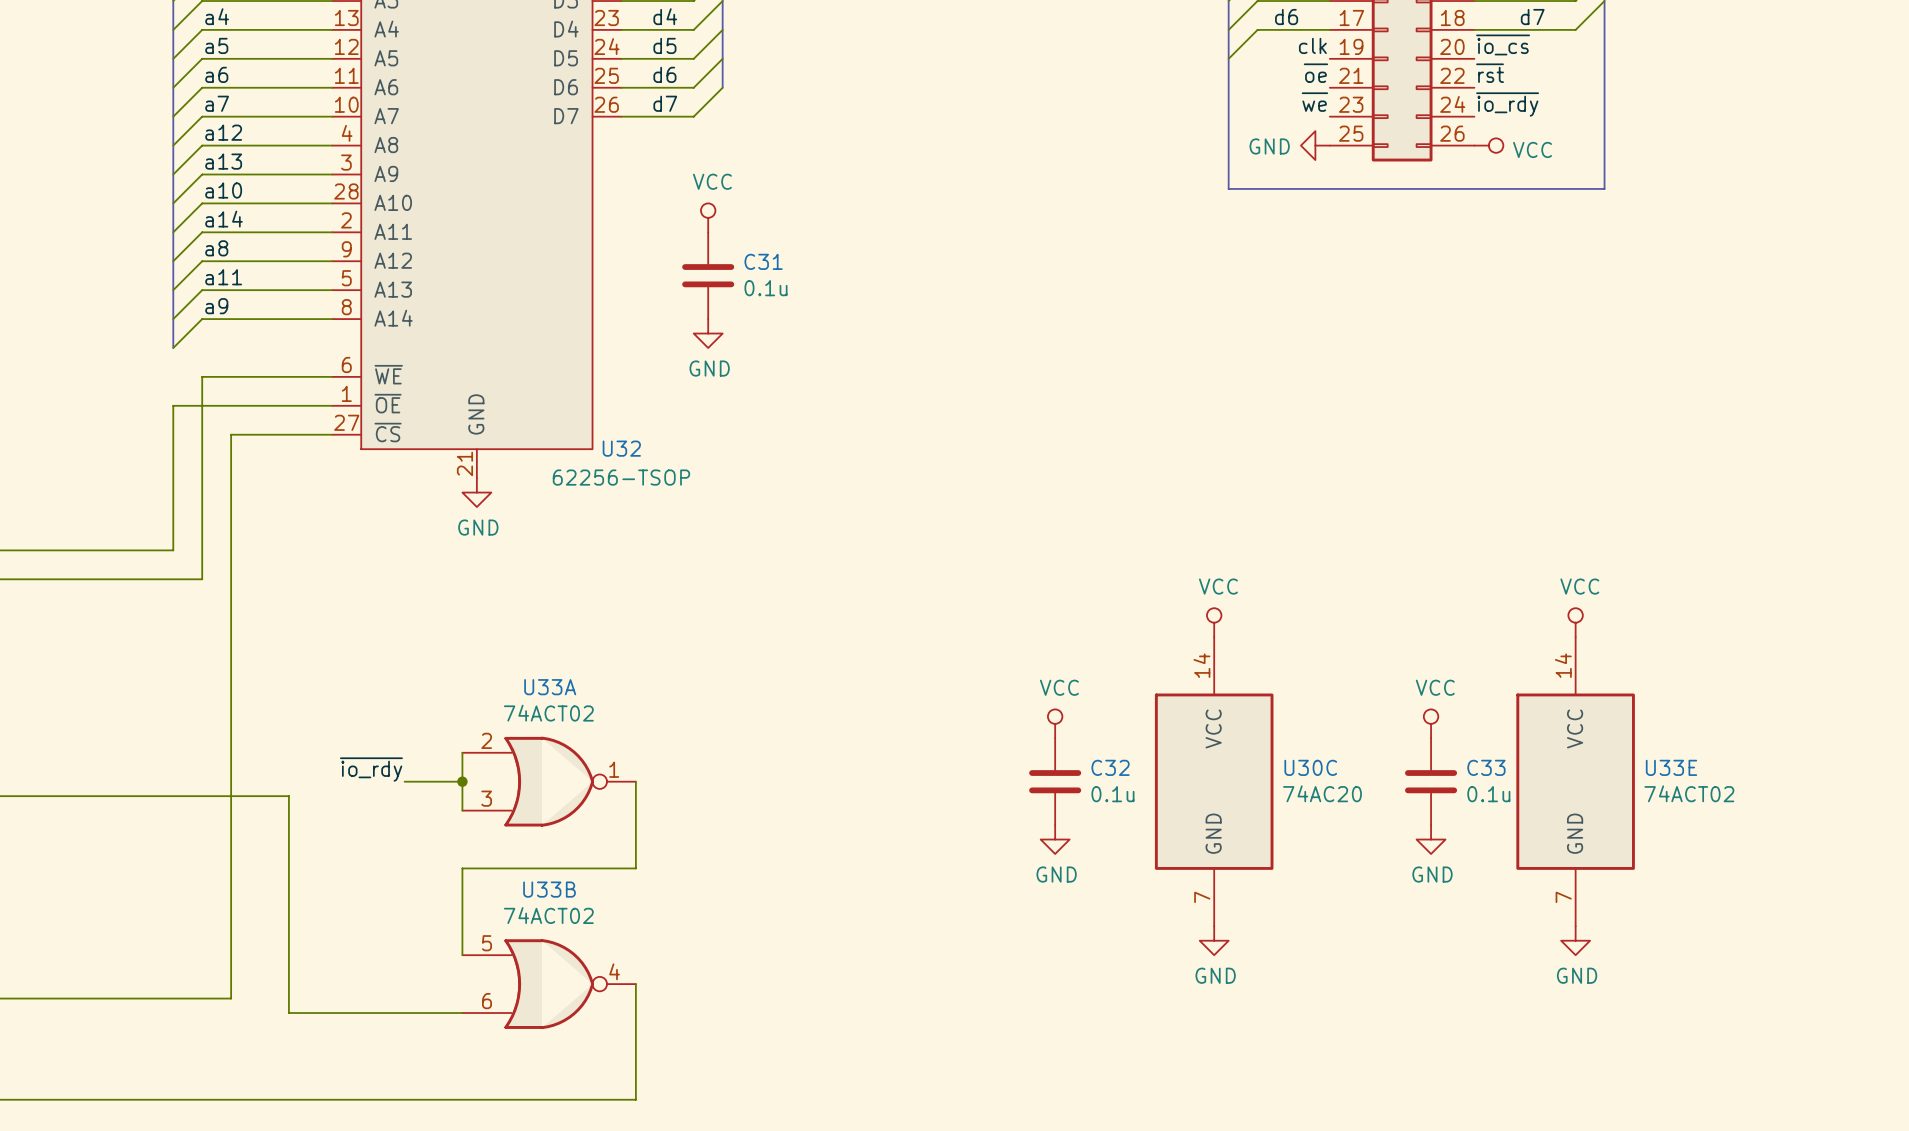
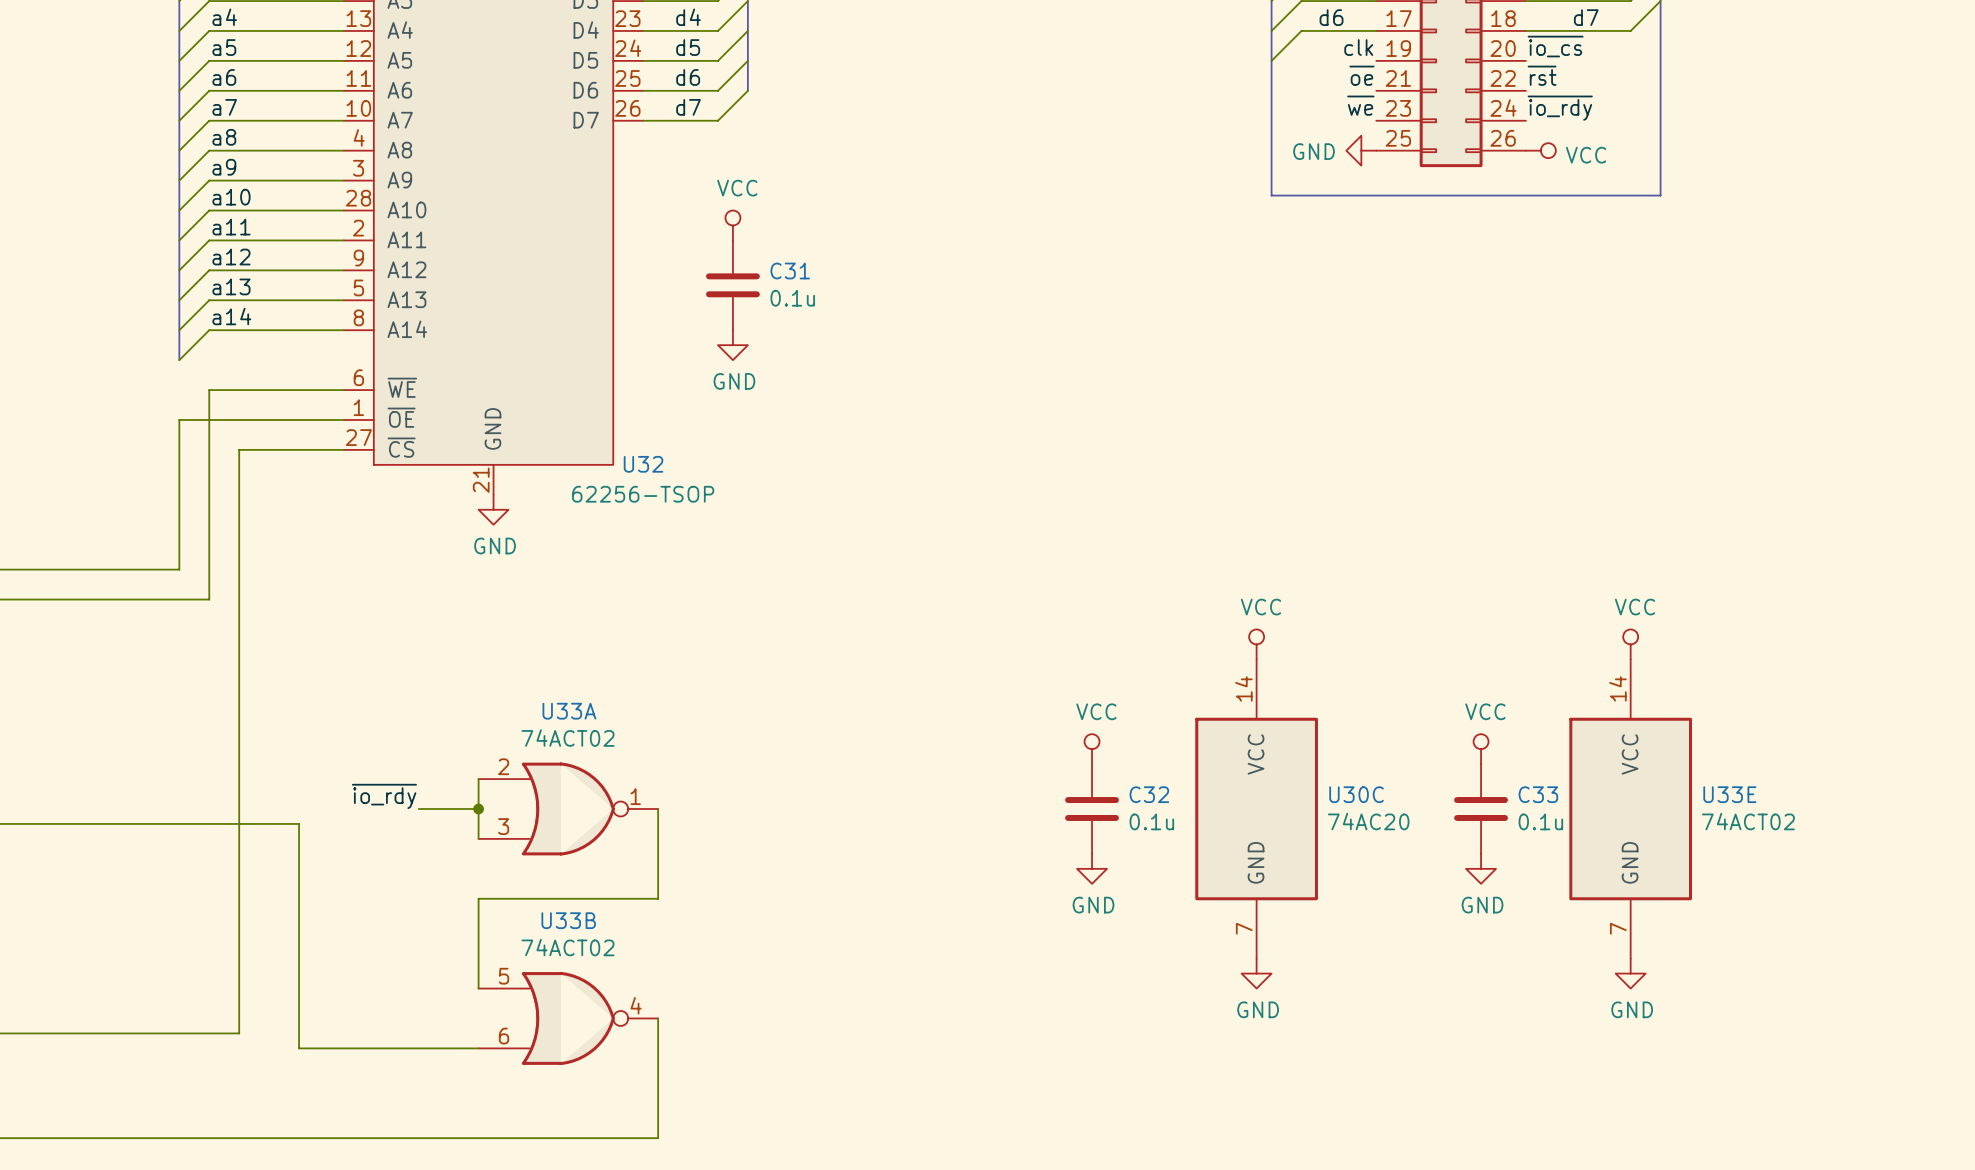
label: a12 (223, 132) -> a8 (224, 137)
label: a13 (223, 161) -> a9 (224, 167)
label: a14 (223, 219) -> a11 (231, 227)
label: a8 (216, 248) -> a12 (231, 257)
label: a11 (223, 277) -> a13 (231, 286)
label: a9 (216, 306) -> a14 (231, 316)

